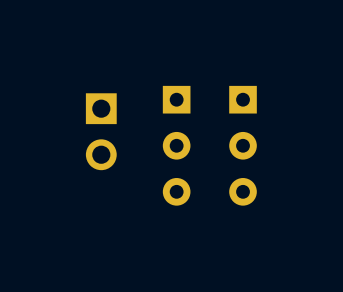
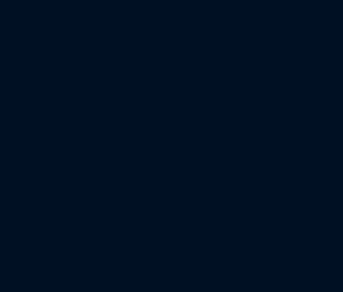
part: (101, 131) -> none
part: (176, 145) -> none
part: (243, 145) -> none

